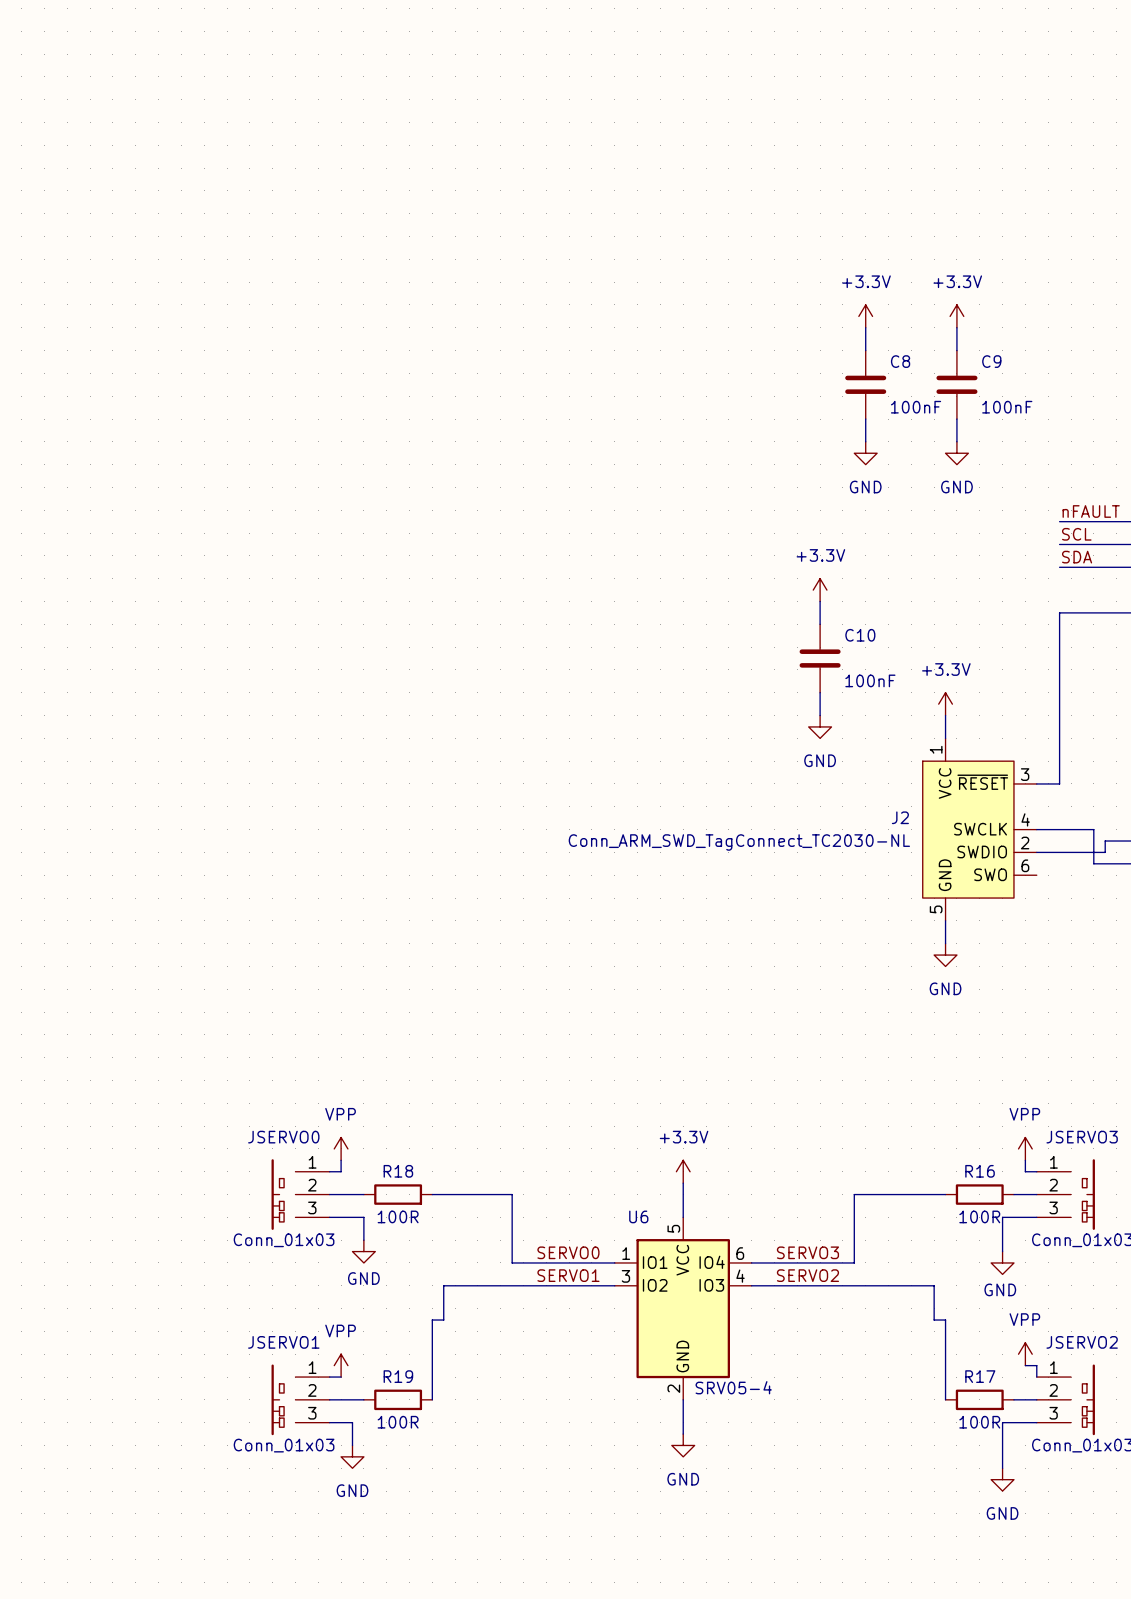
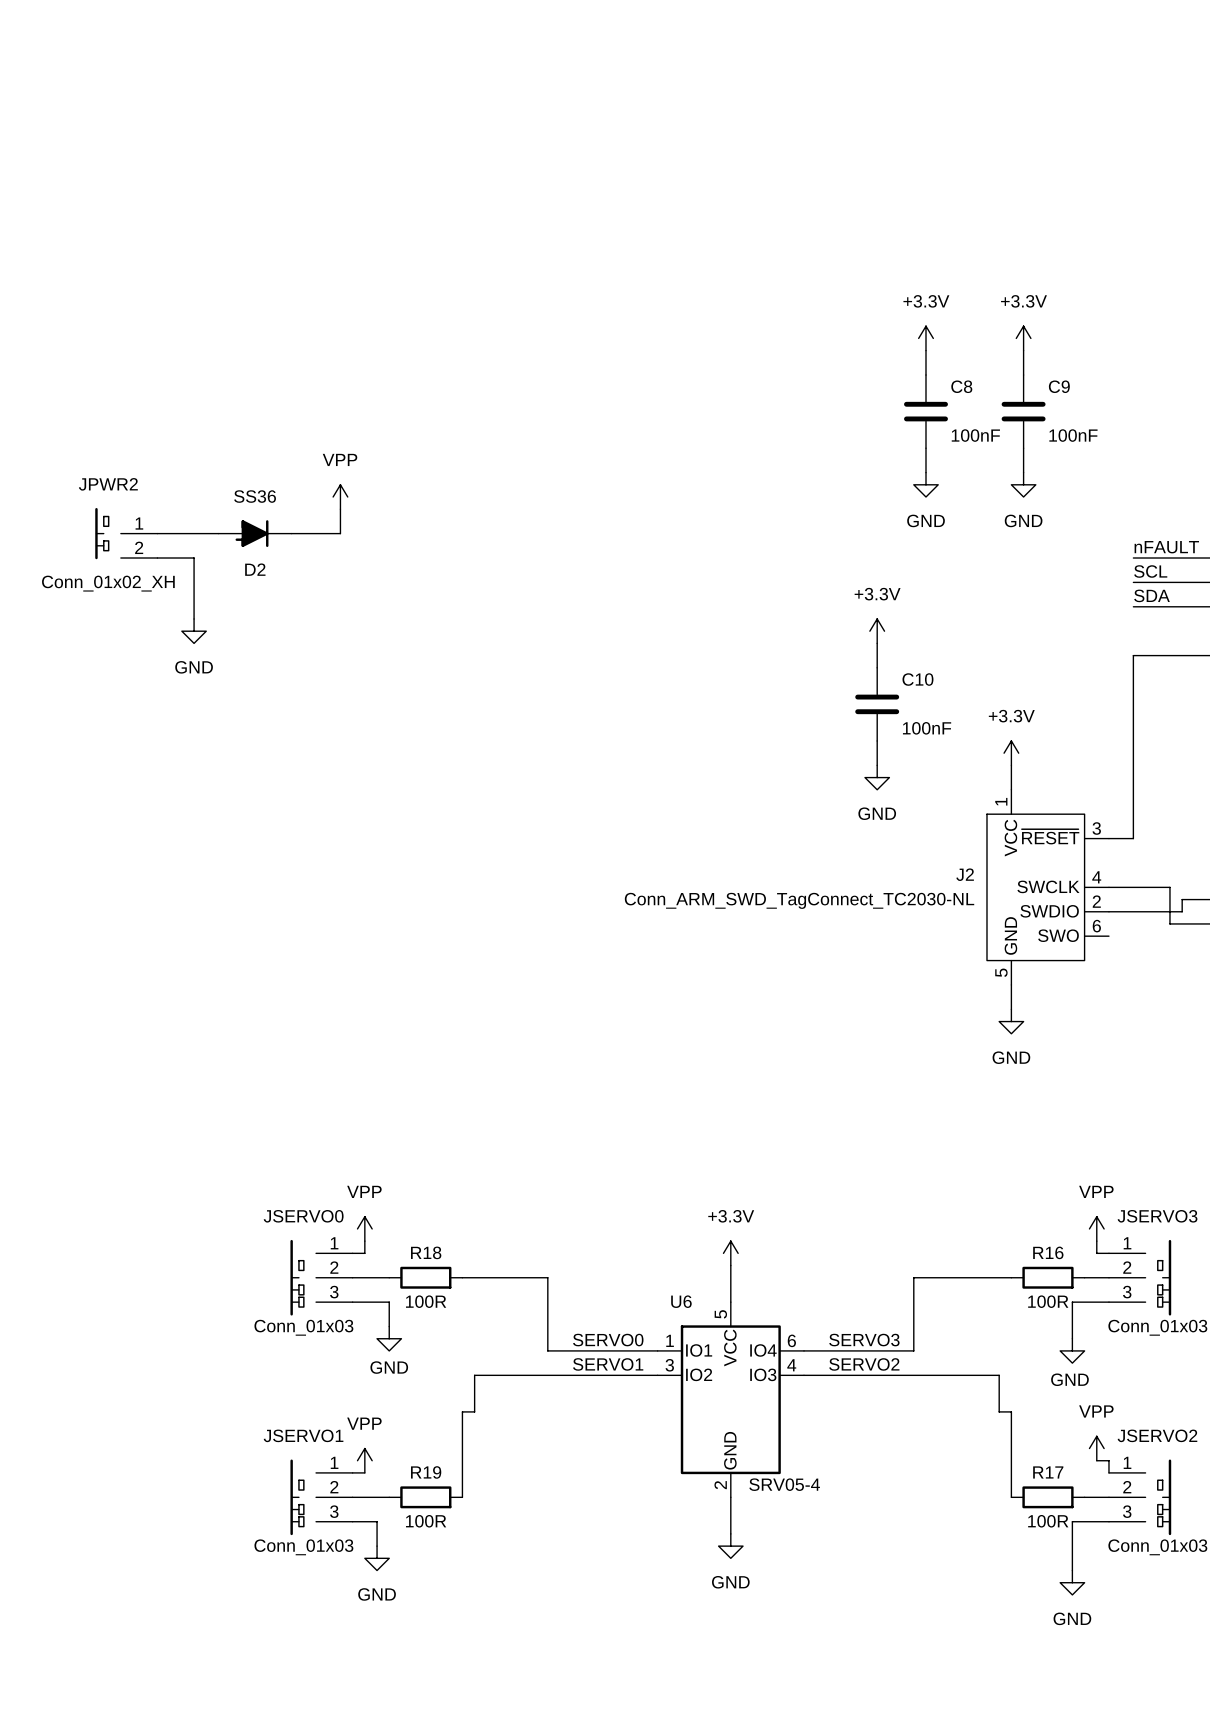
power symbol: none -> VPP (340, 497)
wire: none -> (340, 509) (340, 533) (291, 533)
JPWR2: none -> Conn_01x02_XH (126, 533)
wire: none -> (157, 533) (218, 533)
D2: none -> SS36 (255, 533)
wire: none -> (157, 558) (194, 558) (194, 618)
power symbol: none -> GND (194, 631)

